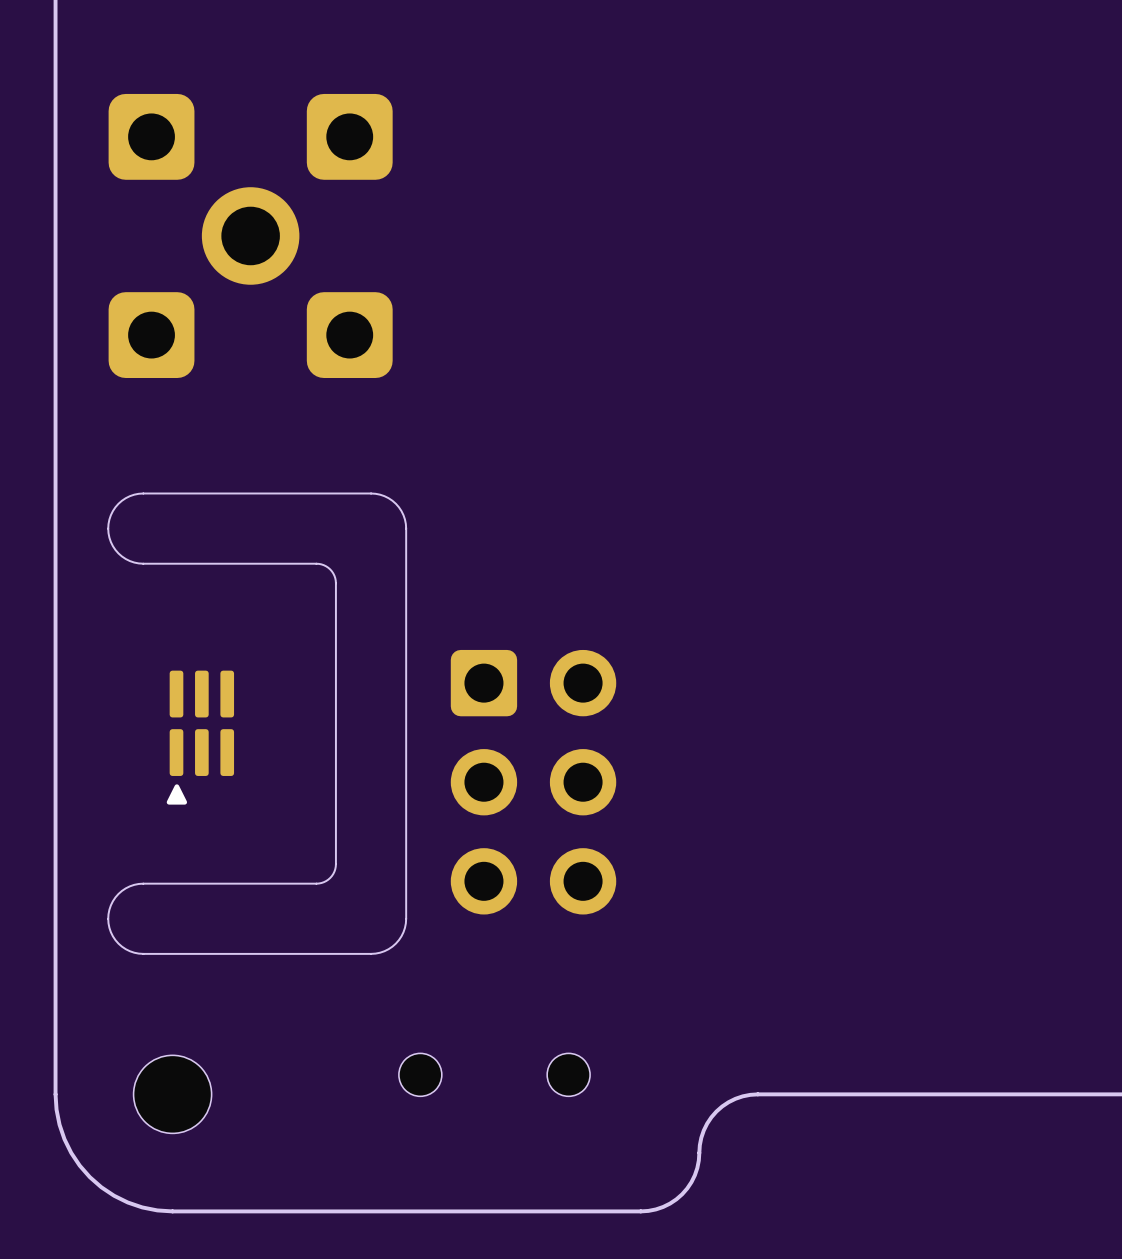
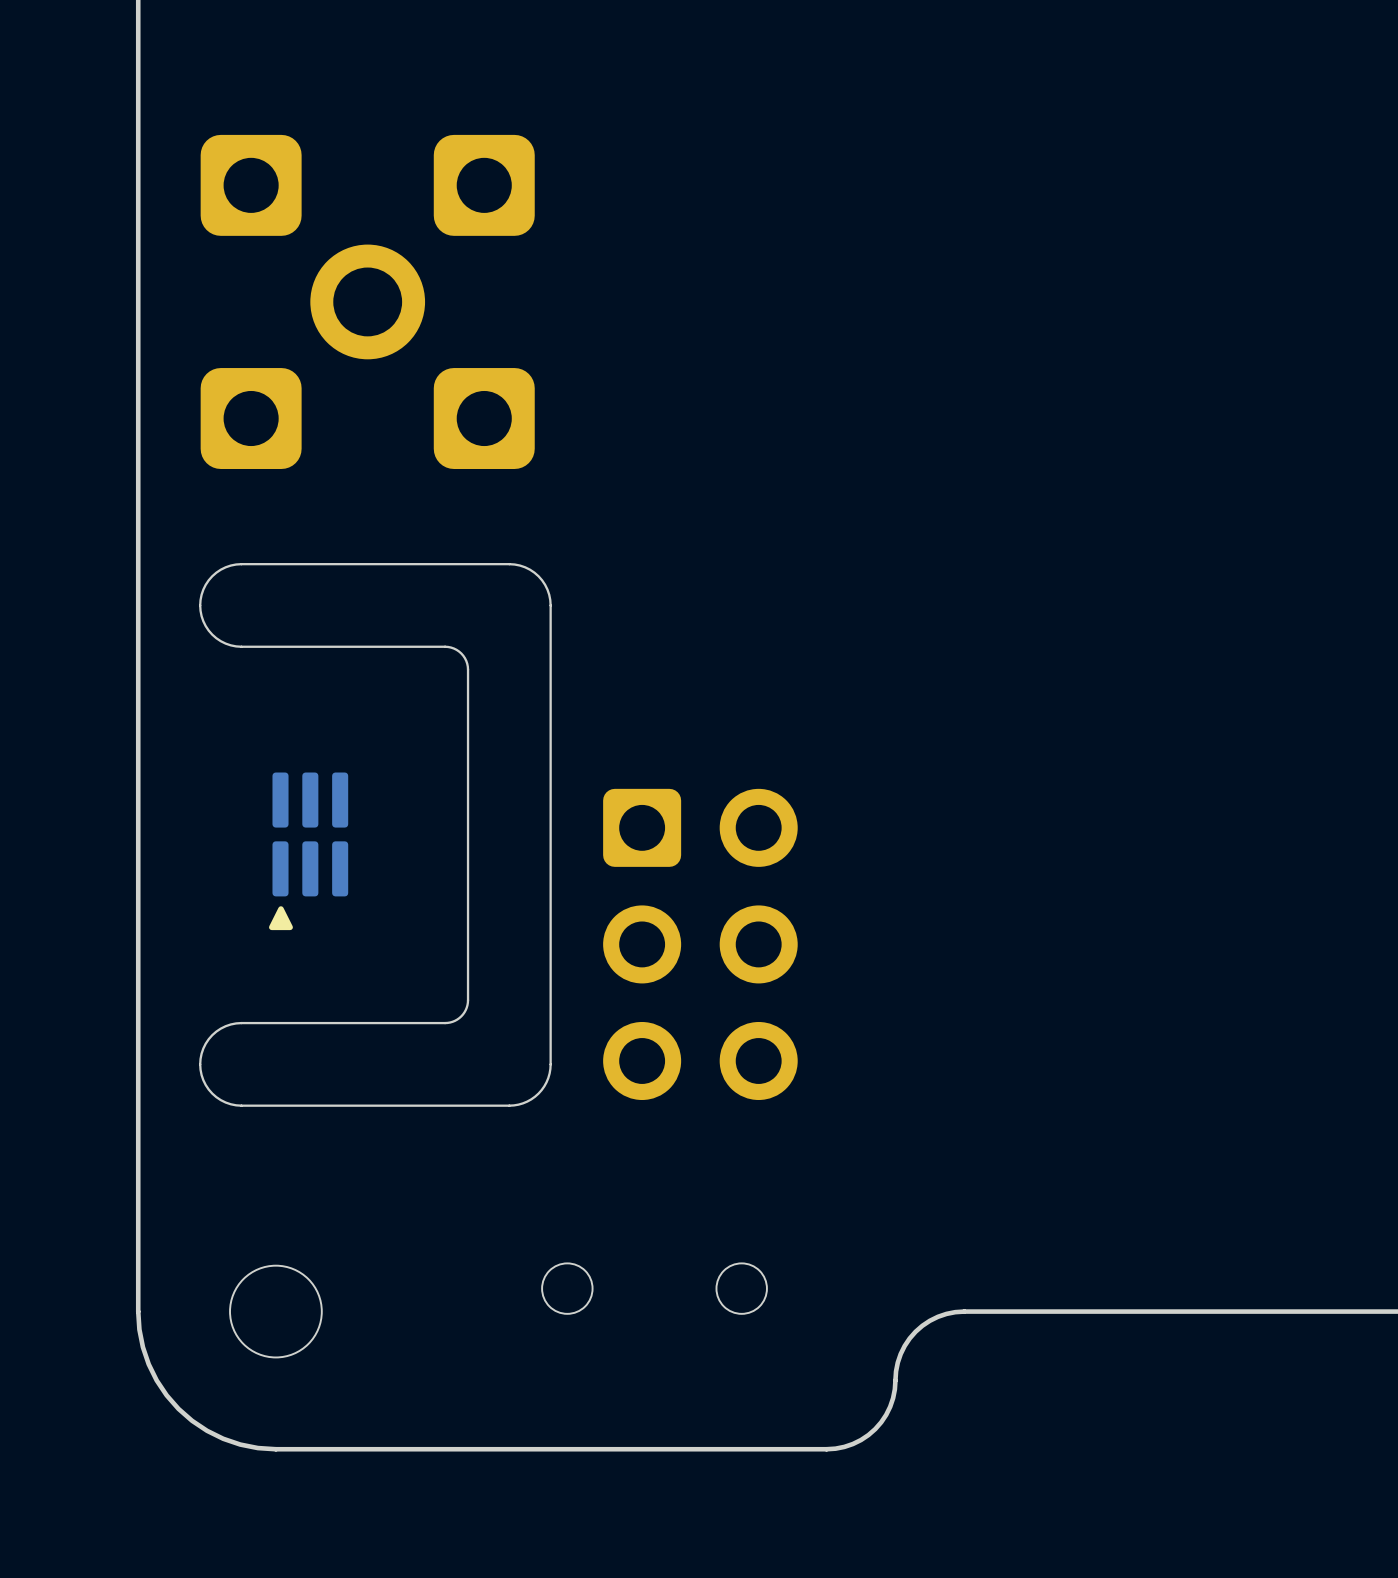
board edge: (406, 528) (403, 515) (395, 503) (384, 496) (371, 493) (138, 493) (129, 496) (118, 503) (109, 519) (108, 533) (112, 546) (121, 556) (134, 562) (318, 563) (331, 571) (335, 583) -> (550, 646) (550, 605) (547, 589) (534, 572) (514, 564) (236, 564) (216, 572) (203, 589) (200, 605) (203, 621) (216, 638) (230, 645) (445, 646) (453, 648) (463, 655) (467, 663) (468, 710)
part position: (200, 737) -> (308, 851)
board edge: (335, 829) (335, 869) (330, 877) (323, 882) (134, 884) (121, 890) (110, 905) (108, 918) (110, 932) (121, 946) (138, 953) (375, 953) (392, 946) (403, 932) (406, 918) (406, 884) -> (468, 1000) (465, 1010) (461, 1016) (447, 1022) (230, 1024) (216, 1031) (205, 1043) (200, 1058) (201, 1075) (208, 1089) (216, 1097) (236, 1105) (509, 1105) (522, 1103) (538, 1093) (546, 1082) (550, 1064)

